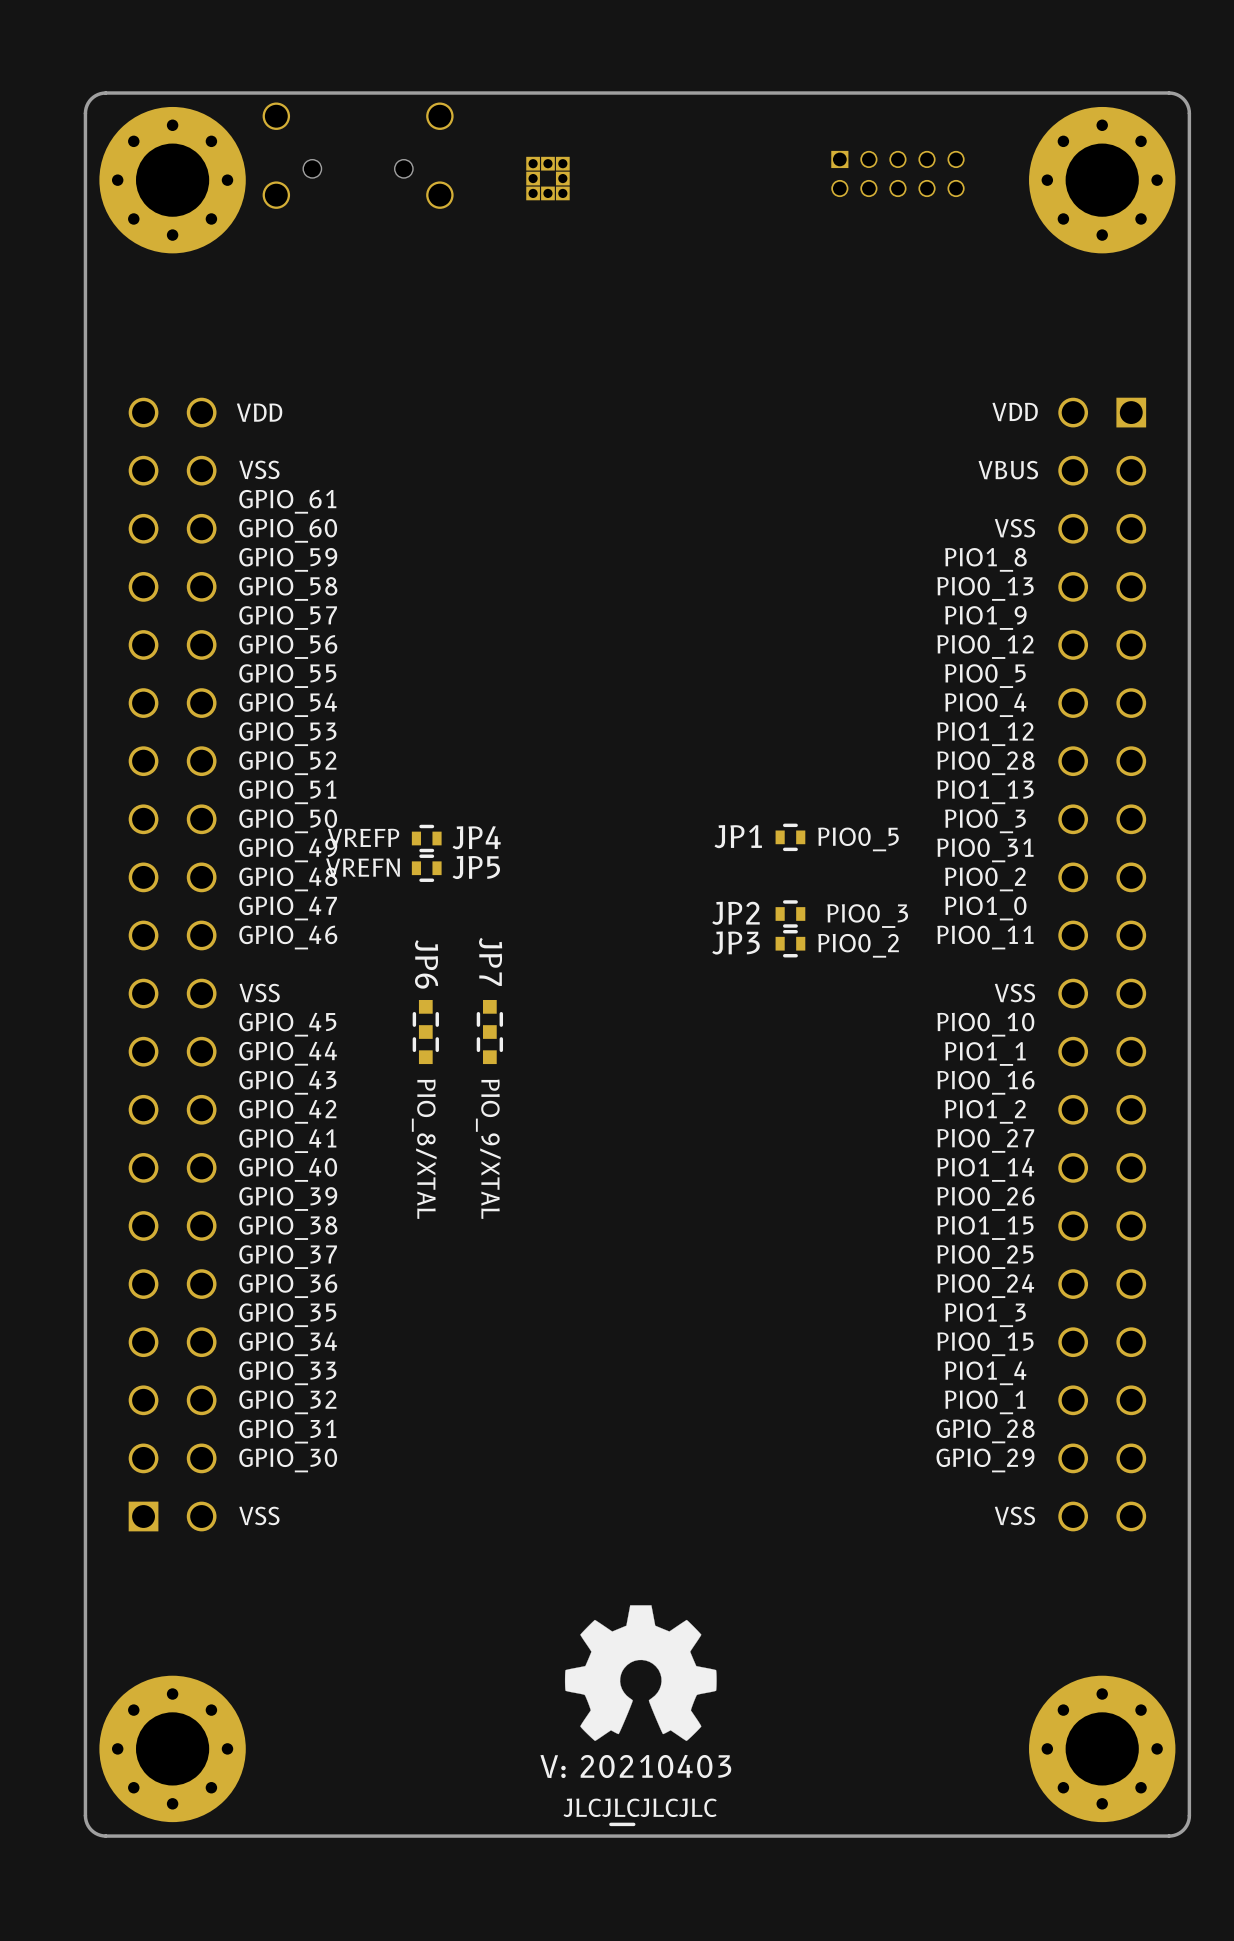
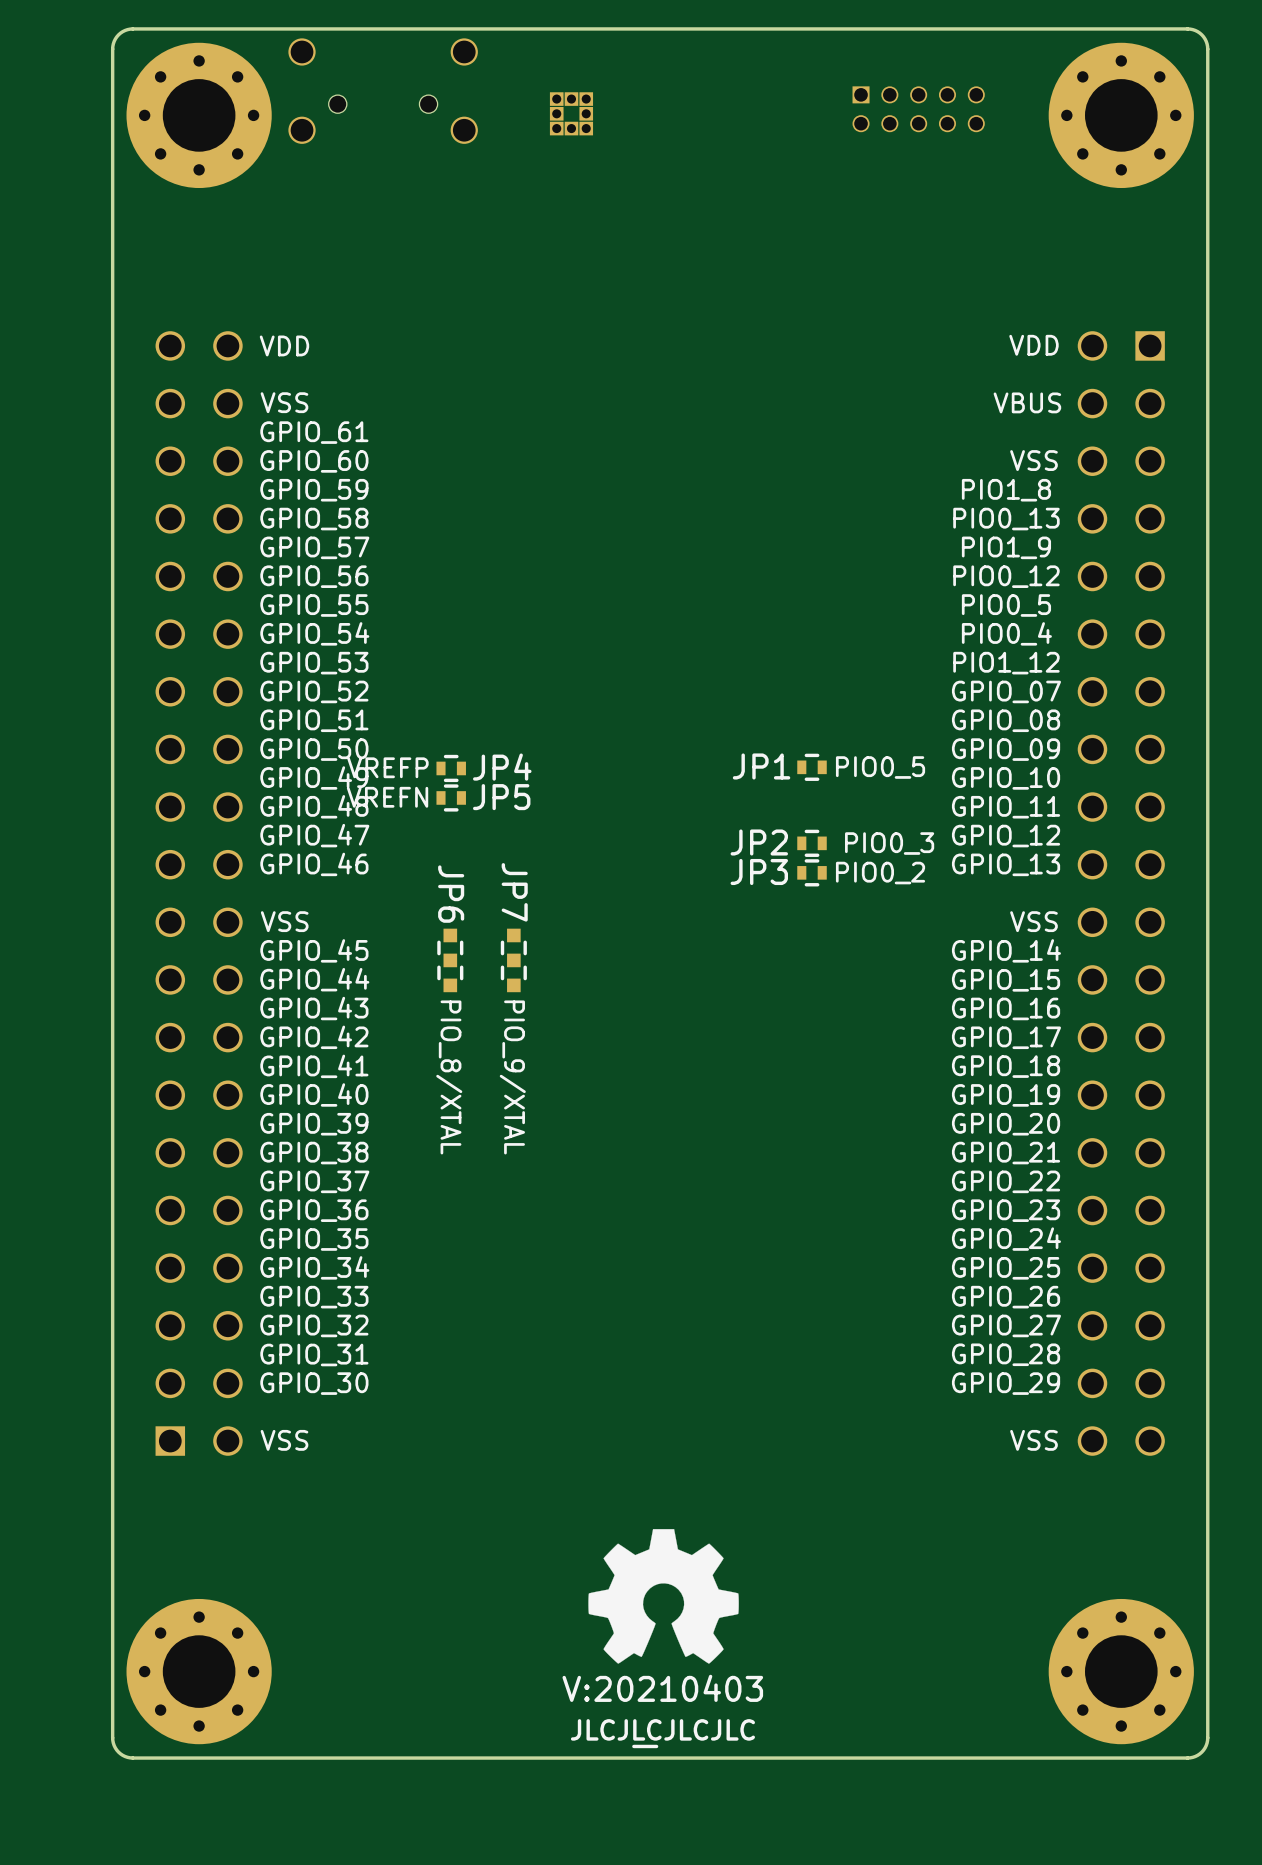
part footprint: [1058, 397, 1147, 1532] -> [1077, 331, 1165, 1456]

